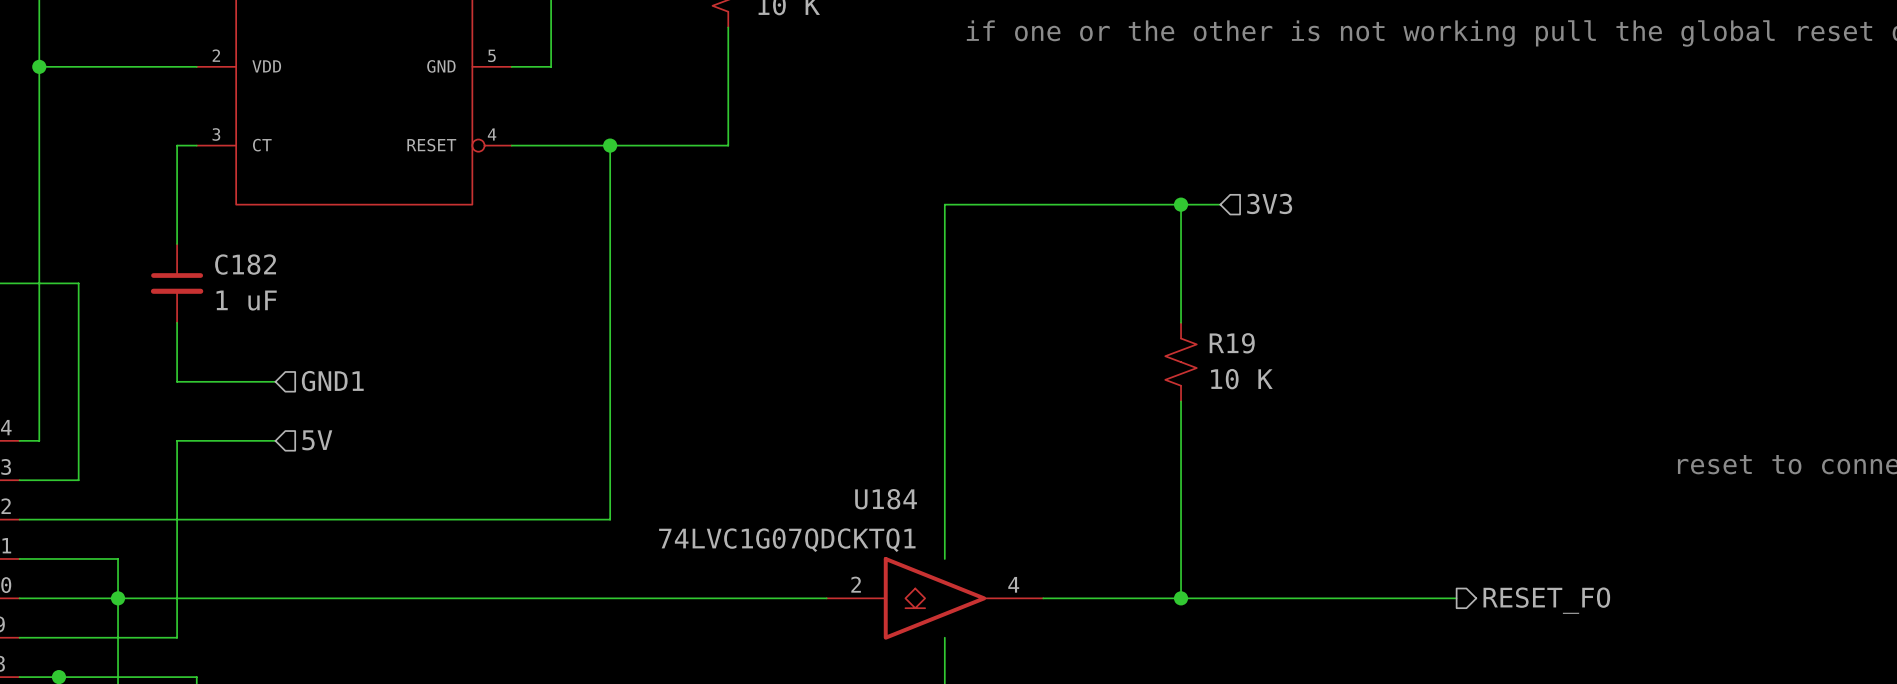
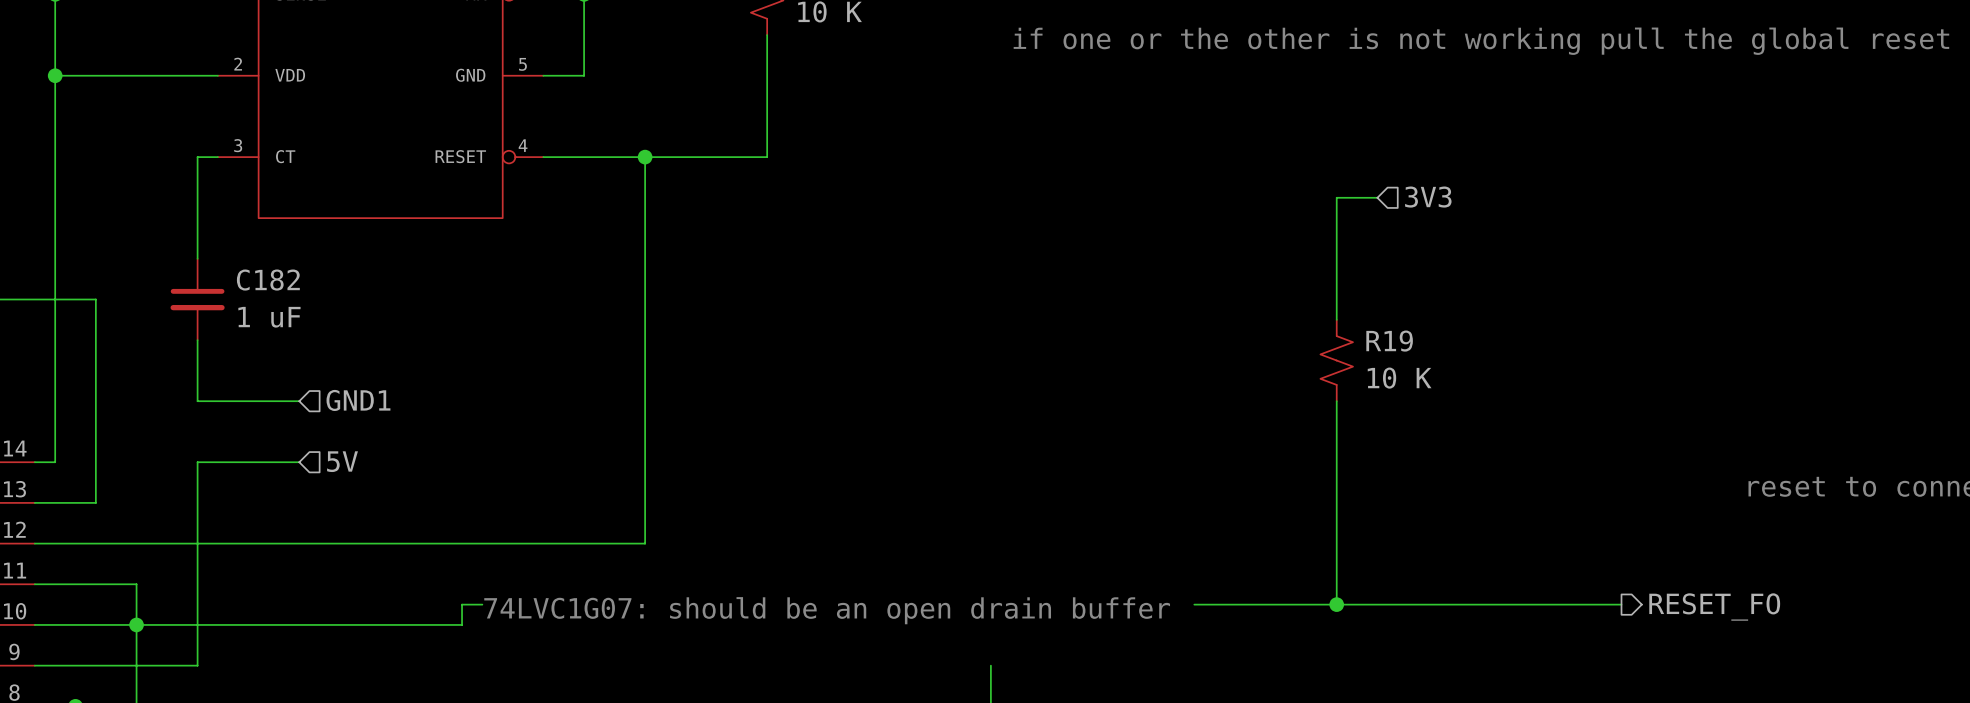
wire: none -> (1377, 197) (1336, 197) (1336, 319)
hierarchical label position: 3V3 (1269, 203) -> 3V3 (1428, 197)
wire: (1181, 204) (1181, 322) -> none
junction: (1181, 204) -> none
wire: (1220, 204) (944, 204) (944, 558) -> none
R19 position: (1181, 362) -> (1336, 360)
wire: (1181, 401) (1181, 598) -> (1336, 401) (1336, 604)
junction: none -> (1336, 604)
text: none -> 74LVC1G07: should be an open drain buffer (827, 610)
wire: (432, 598) (826, 598) -> (462, 624) (462, 604) (482, 604)
U184: 74LVC1G07QDCKTQ1 (934, 598) -> none
wire: (1043, 598) (1456, 598) -> (1194, 604) (1621, 604)
junction: (1181, 598) -> none
hierarchical label position: RESET_FO (1546, 600) -> RESET_FO (1714, 606)

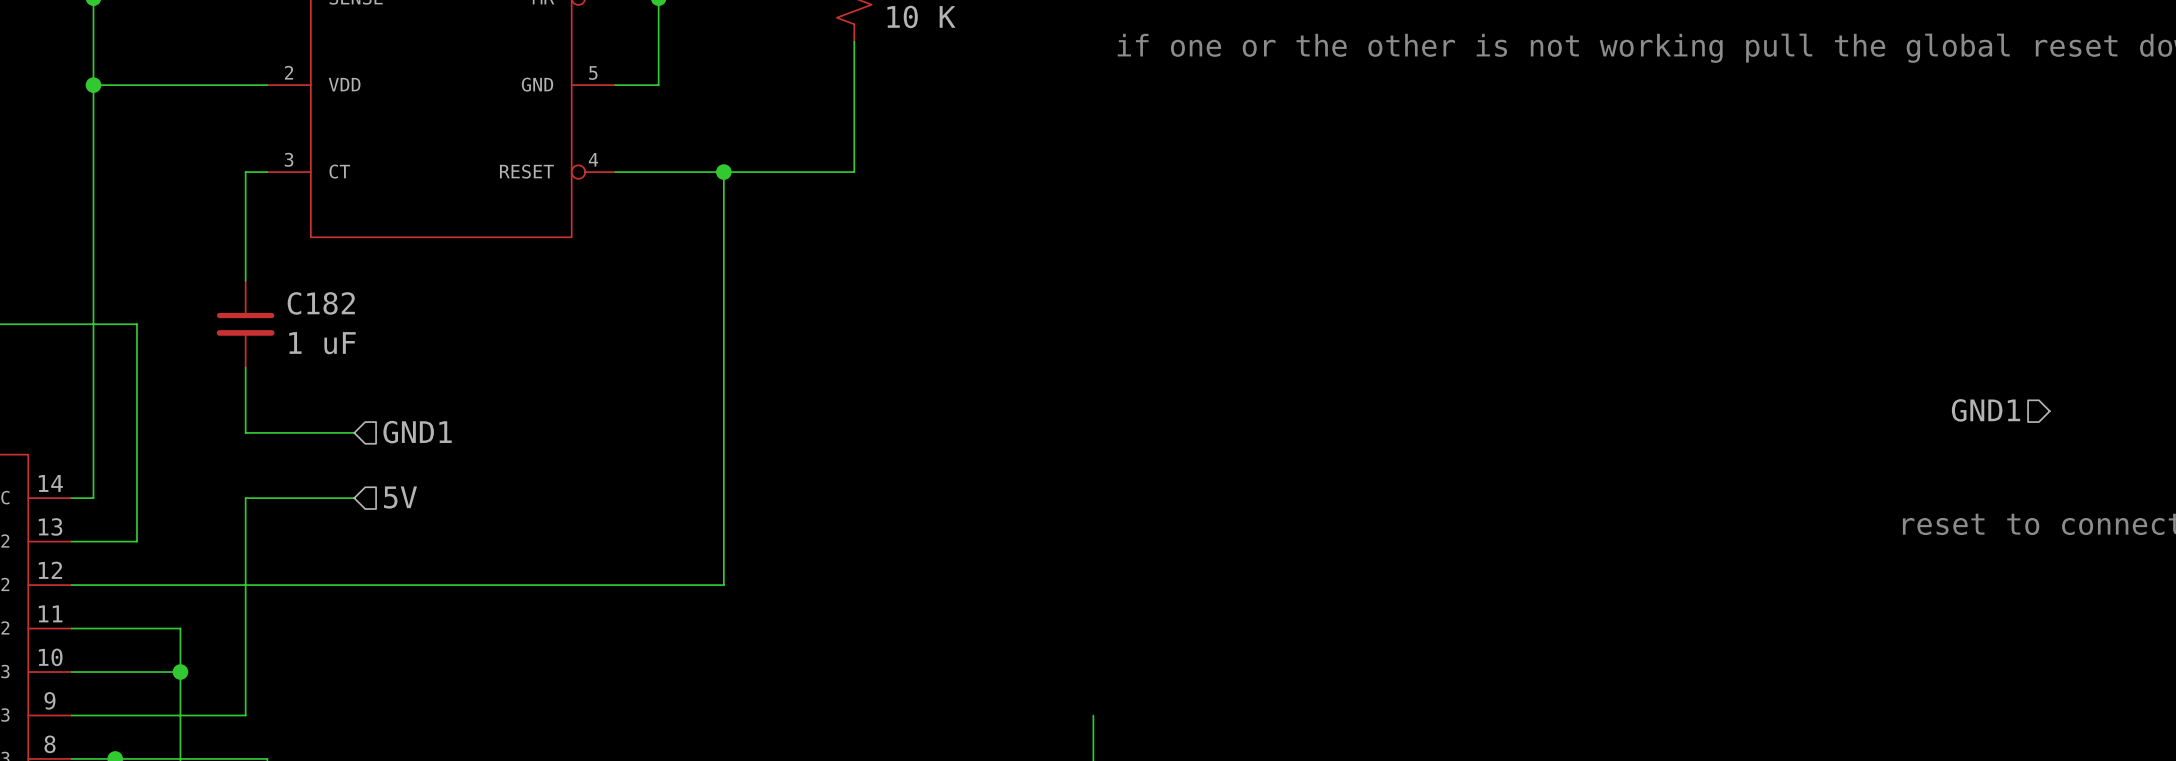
wire: (1377, 197) (1336, 197) (1336, 319) -> none
hierarchical label: 3V3 (1428, 197) -> none
R19: 10 K (1336, 360) -> none
hierarchical label: none -> GND1 (1986, 410)
wire: (1336, 401) (1336, 604) -> none
wire: (482, 604) (462, 604) (462, 624) (136, 624) -> none
wire: (1194, 604) (1621, 604) -> none
junction: (1336, 604) -> none
hierarchical label: RESET_FO (1714, 606) -> none
text: 74LVC1G07: should be an open drain buffer (827, 610) -> none

